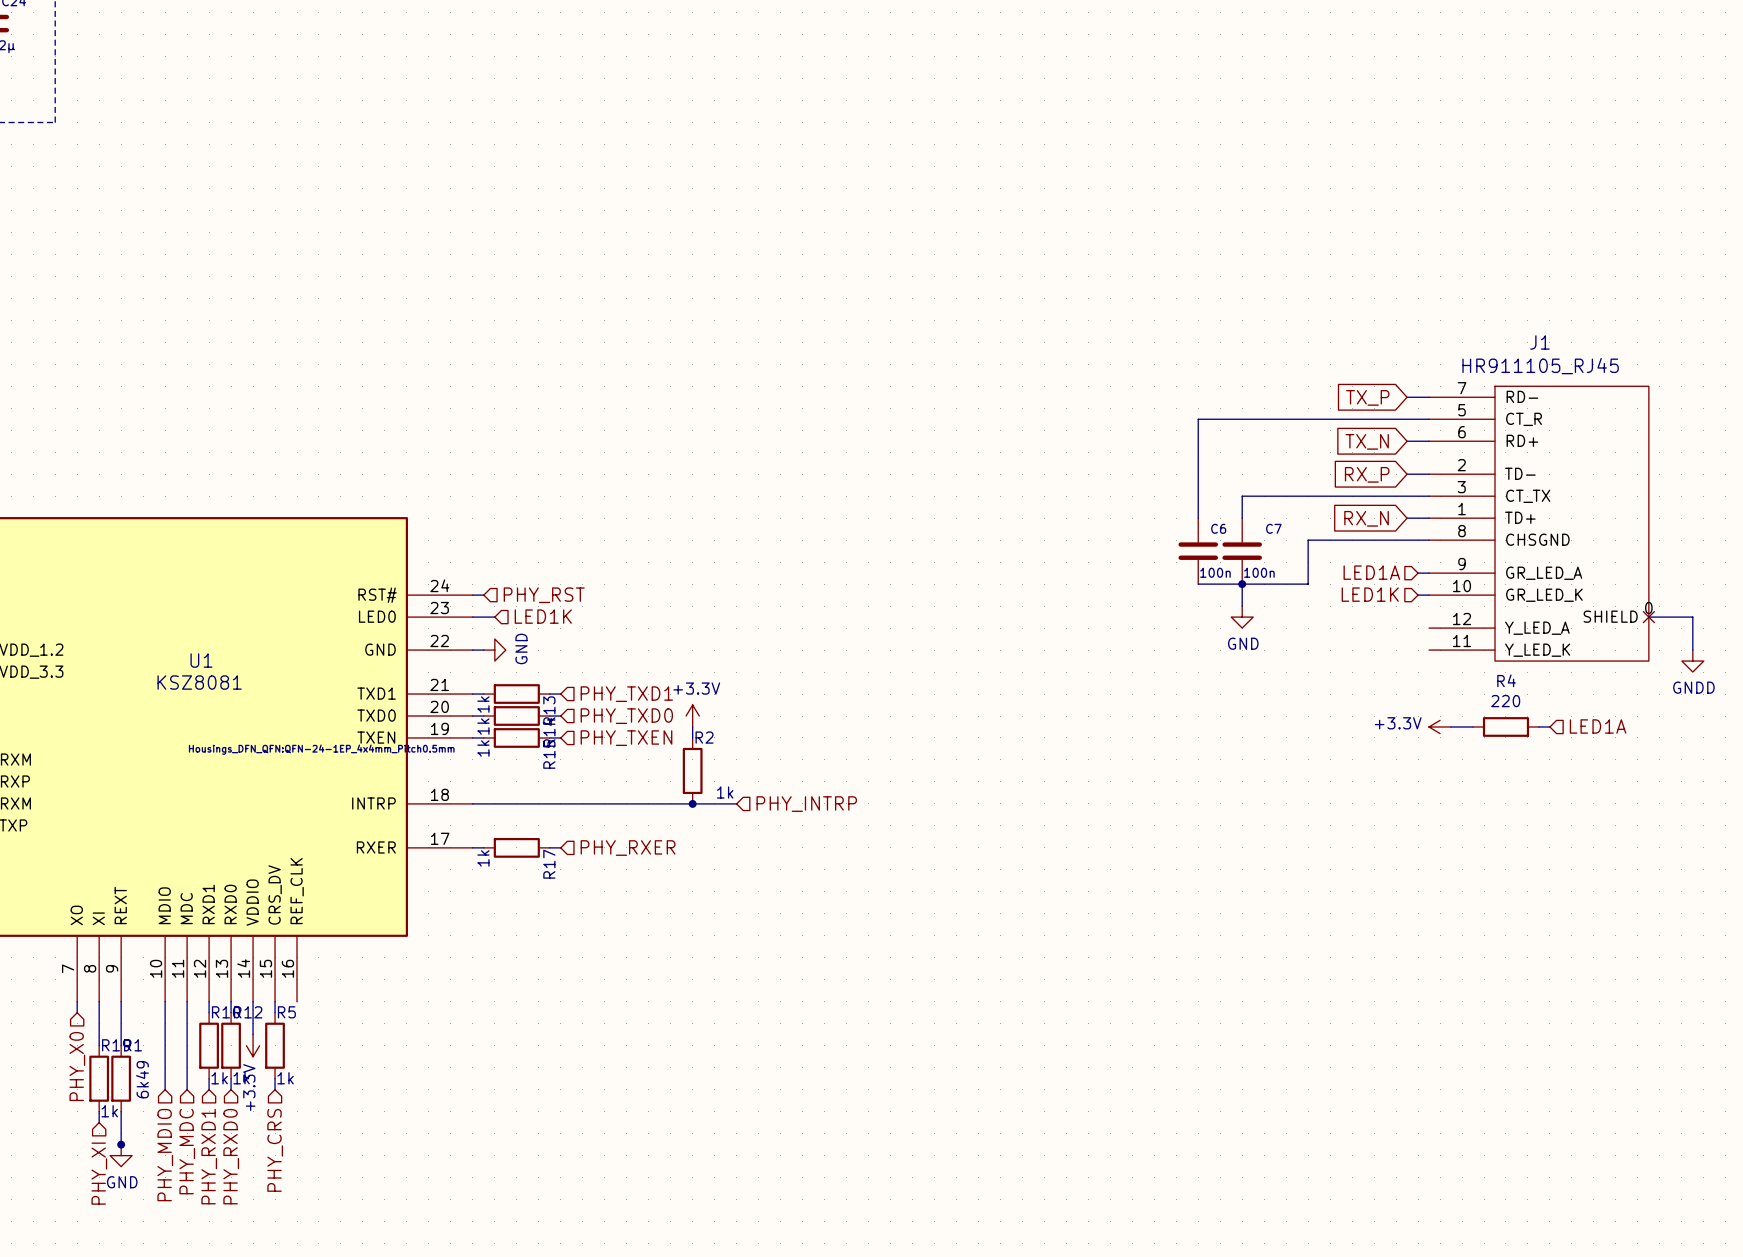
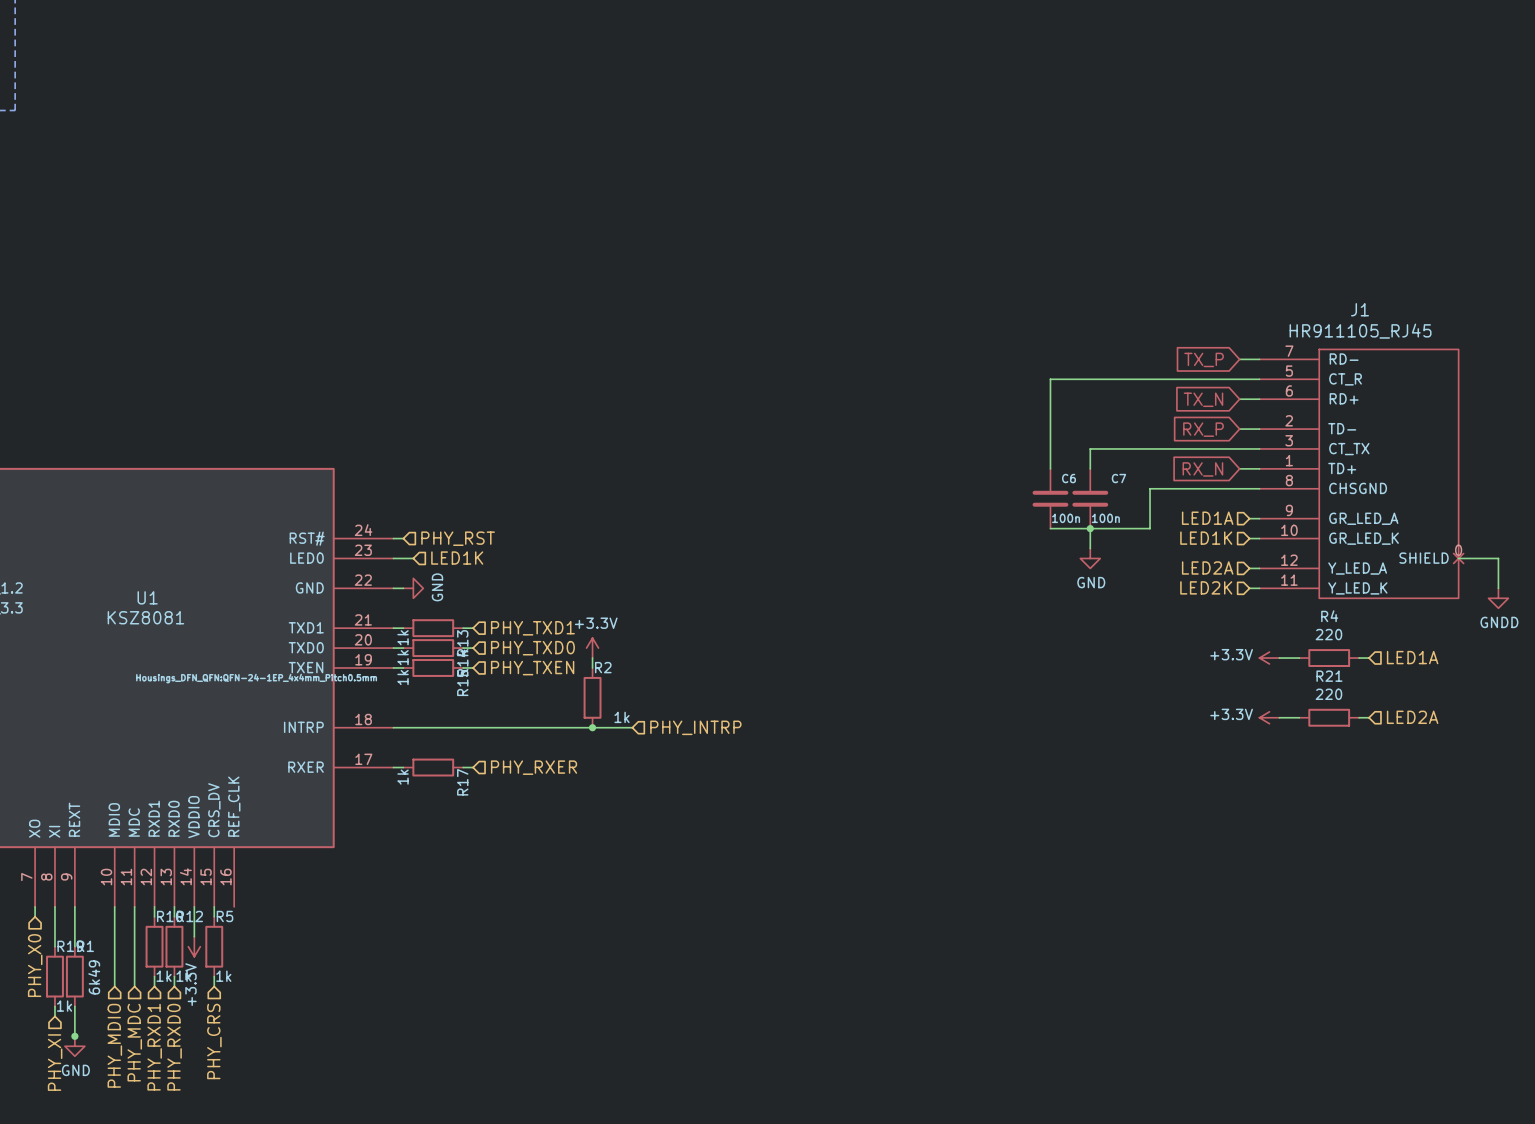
hierarchical label: none -> LED2A (1207, 567)
wire: none -> (1249, 568) (1259, 568)
hierarchical label: none -> LED2K (1206, 587)
wire: none -> (1249, 588) (1259, 588)
power symbol: none -> +3.3V (1269, 717)
wire: none -> (1279, 717) (1299, 717)
R21: none -> 220 (1329, 717)
wire: none -> (1359, 717) (1369, 717)
hierarchical label: none -> LED2A (1412, 717)

